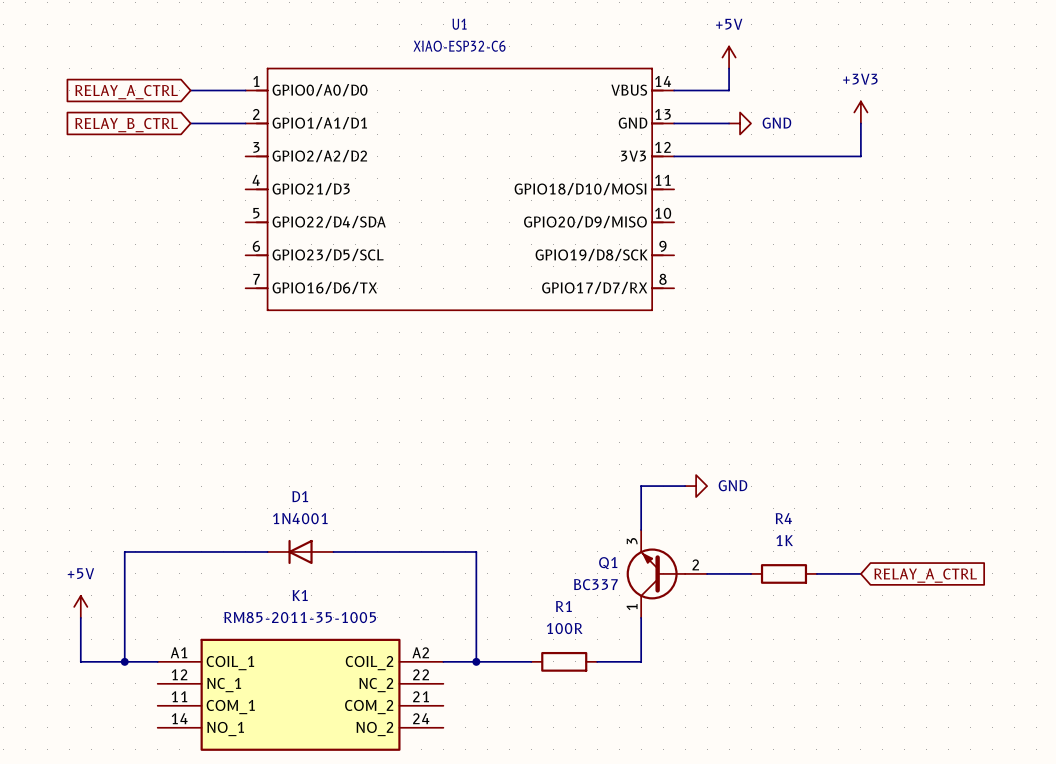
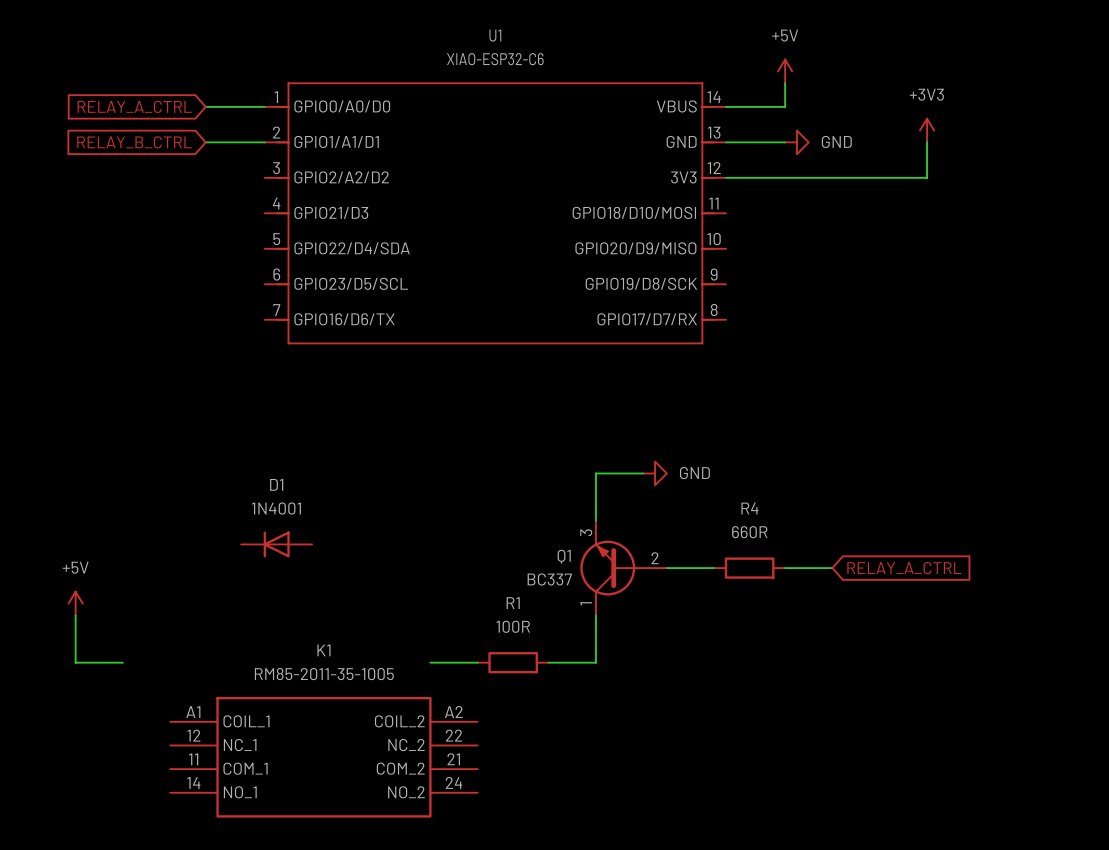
wire: (685, 486) (641, 486) (641, 530) -> (643, 473) (595, 473) (595, 520)
power symbol position: GND (696, 486) -> GND (655, 473)
R4 value: 1K (784, 540) -> 660R (749, 532)
wire: (267, 551) (124, 551) (124, 661) -> none
D1 position: (300, 551) -> (276, 544)
wire: (333, 551) (476, 551) (476, 661) -> none
wire: none -> (75, 615) (75, 662) (122, 662)
Q1 position: (666, 573) -> (623, 568)
wire: (707, 573) (751, 573) -> (666, 568) (714, 568)
R4 position: (783, 573) -> (749, 568)
wire: (816, 573) (860, 573) -> (785, 568) (832, 568)
global label position: RELAY_A_CTRL (925, 575) -> RELAY_A_CTRL (904, 568)
power symbol position: +5V (80, 606) -> +5V (75, 603)
wire: none -> (430, 662) (477, 662)
wire: (80, 617) (80, 661) (157, 661) -> none
wire: (641, 617) (641, 661) (597, 661) -> (595, 615) (595, 662) (548, 662)
junction: (124, 661) -> none
wire: (443, 661) (531, 661) -> none
junction: (476, 661) -> none
R1 position: (564, 661) -> (513, 662)

